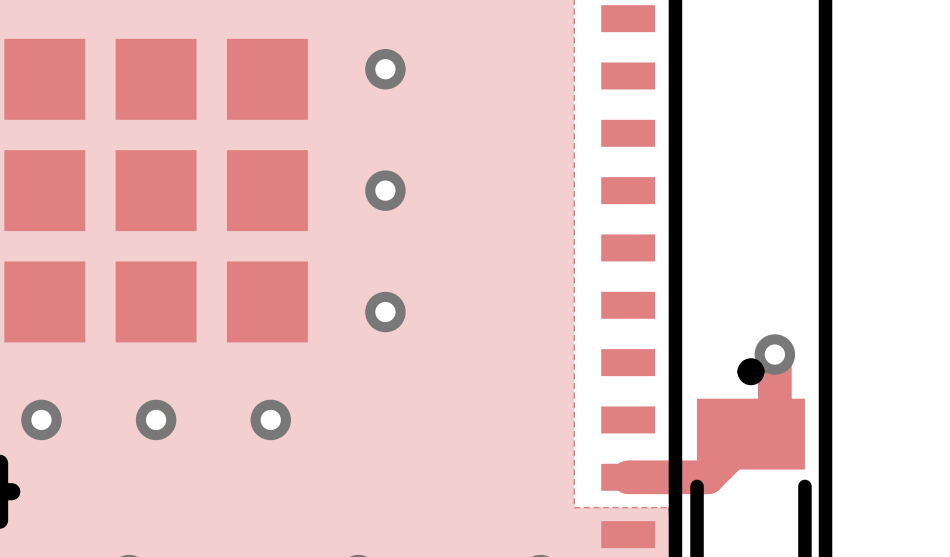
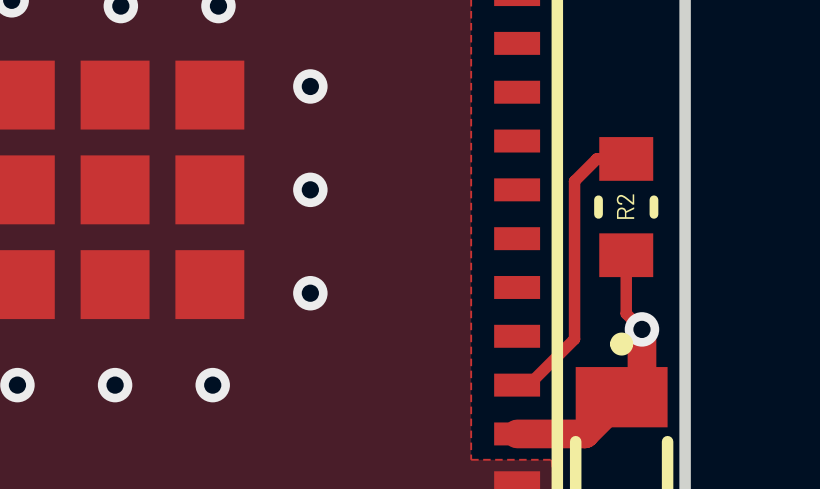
top track: none -> (626, 158) (596, 158) (574, 181) (574, 339) (528, 385)
R2: none -> (626, 207)
top track: none -> (626, 255) (626, 313) (641, 329)

